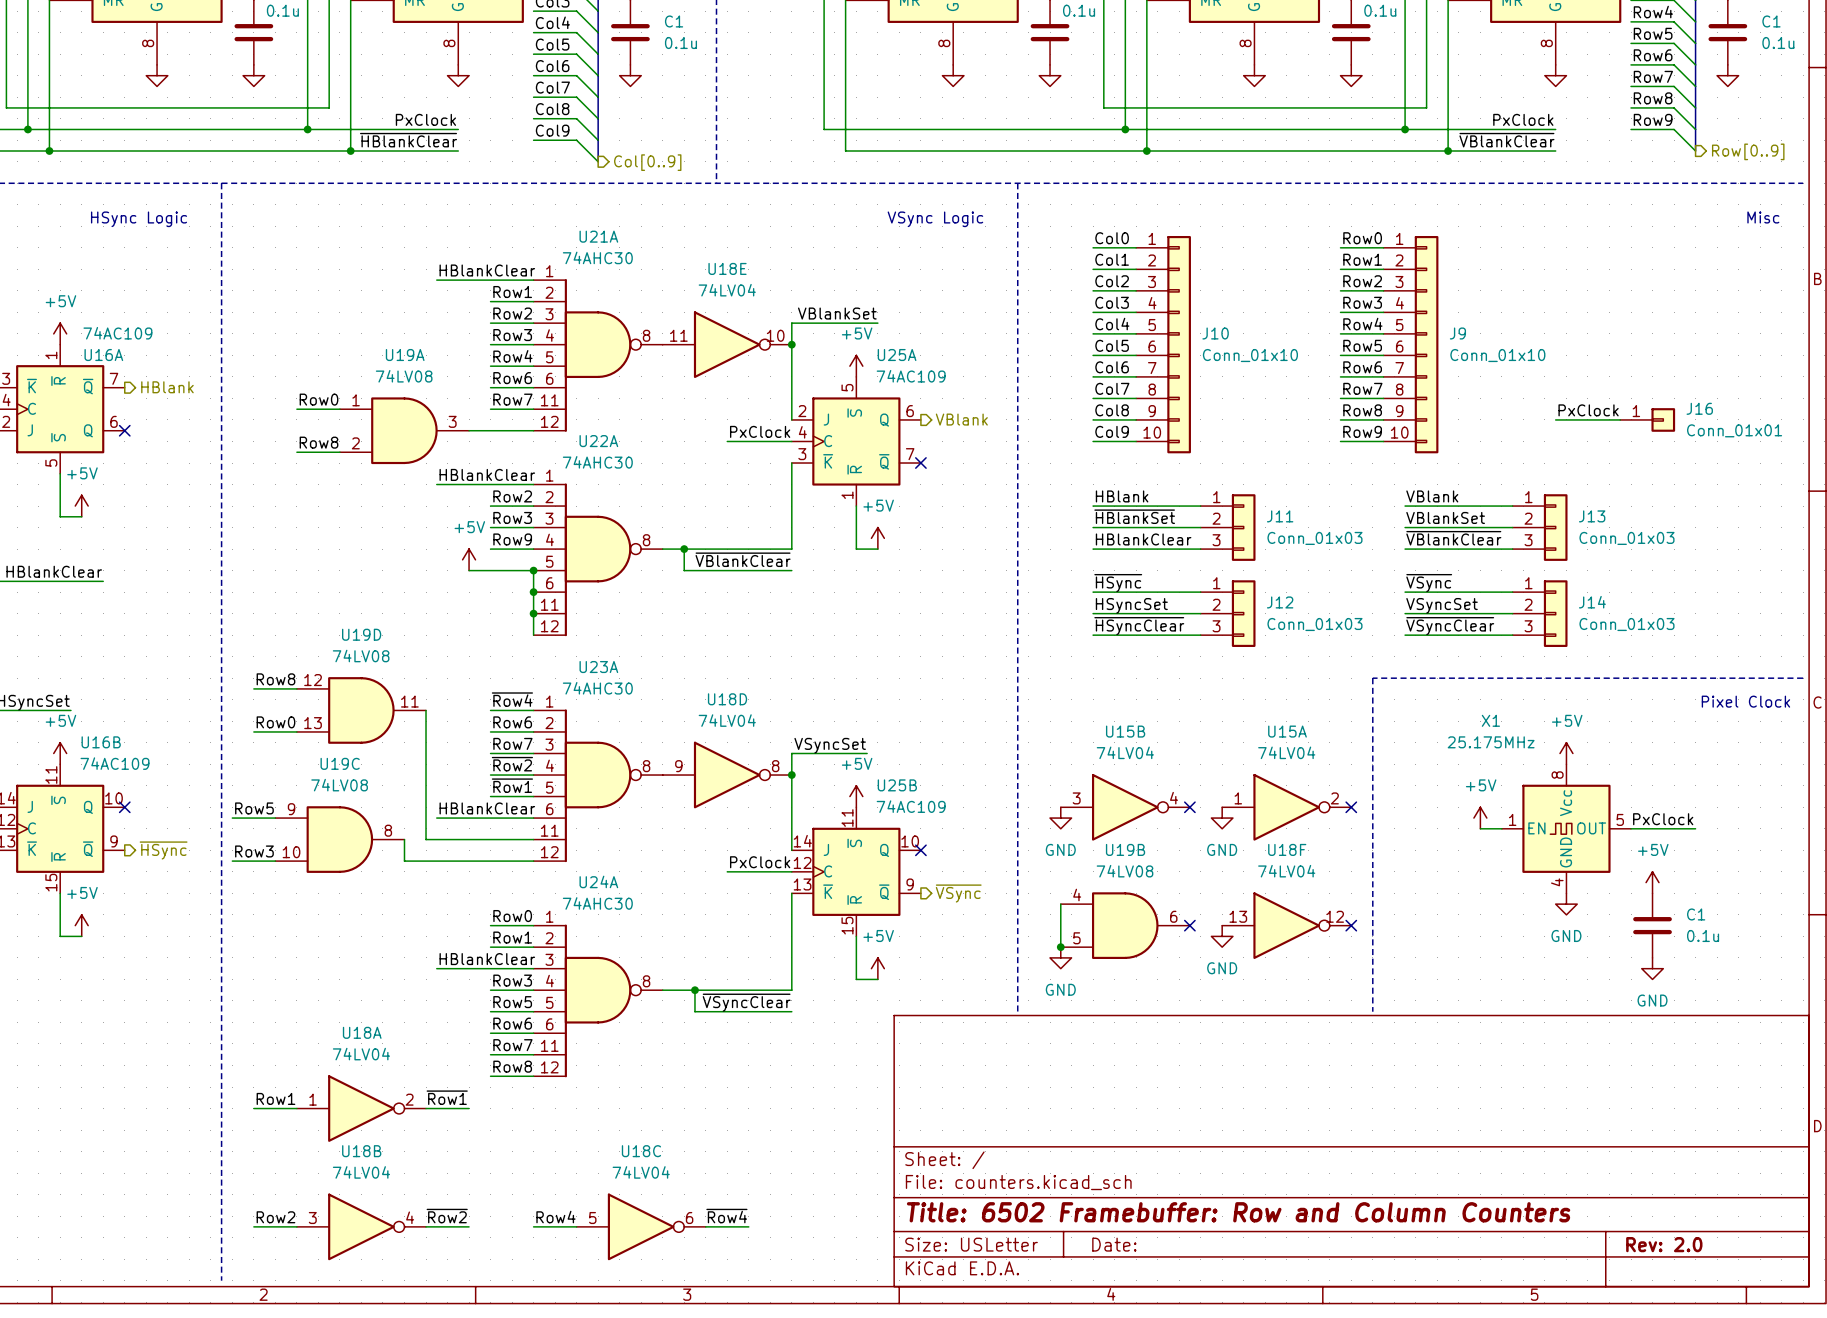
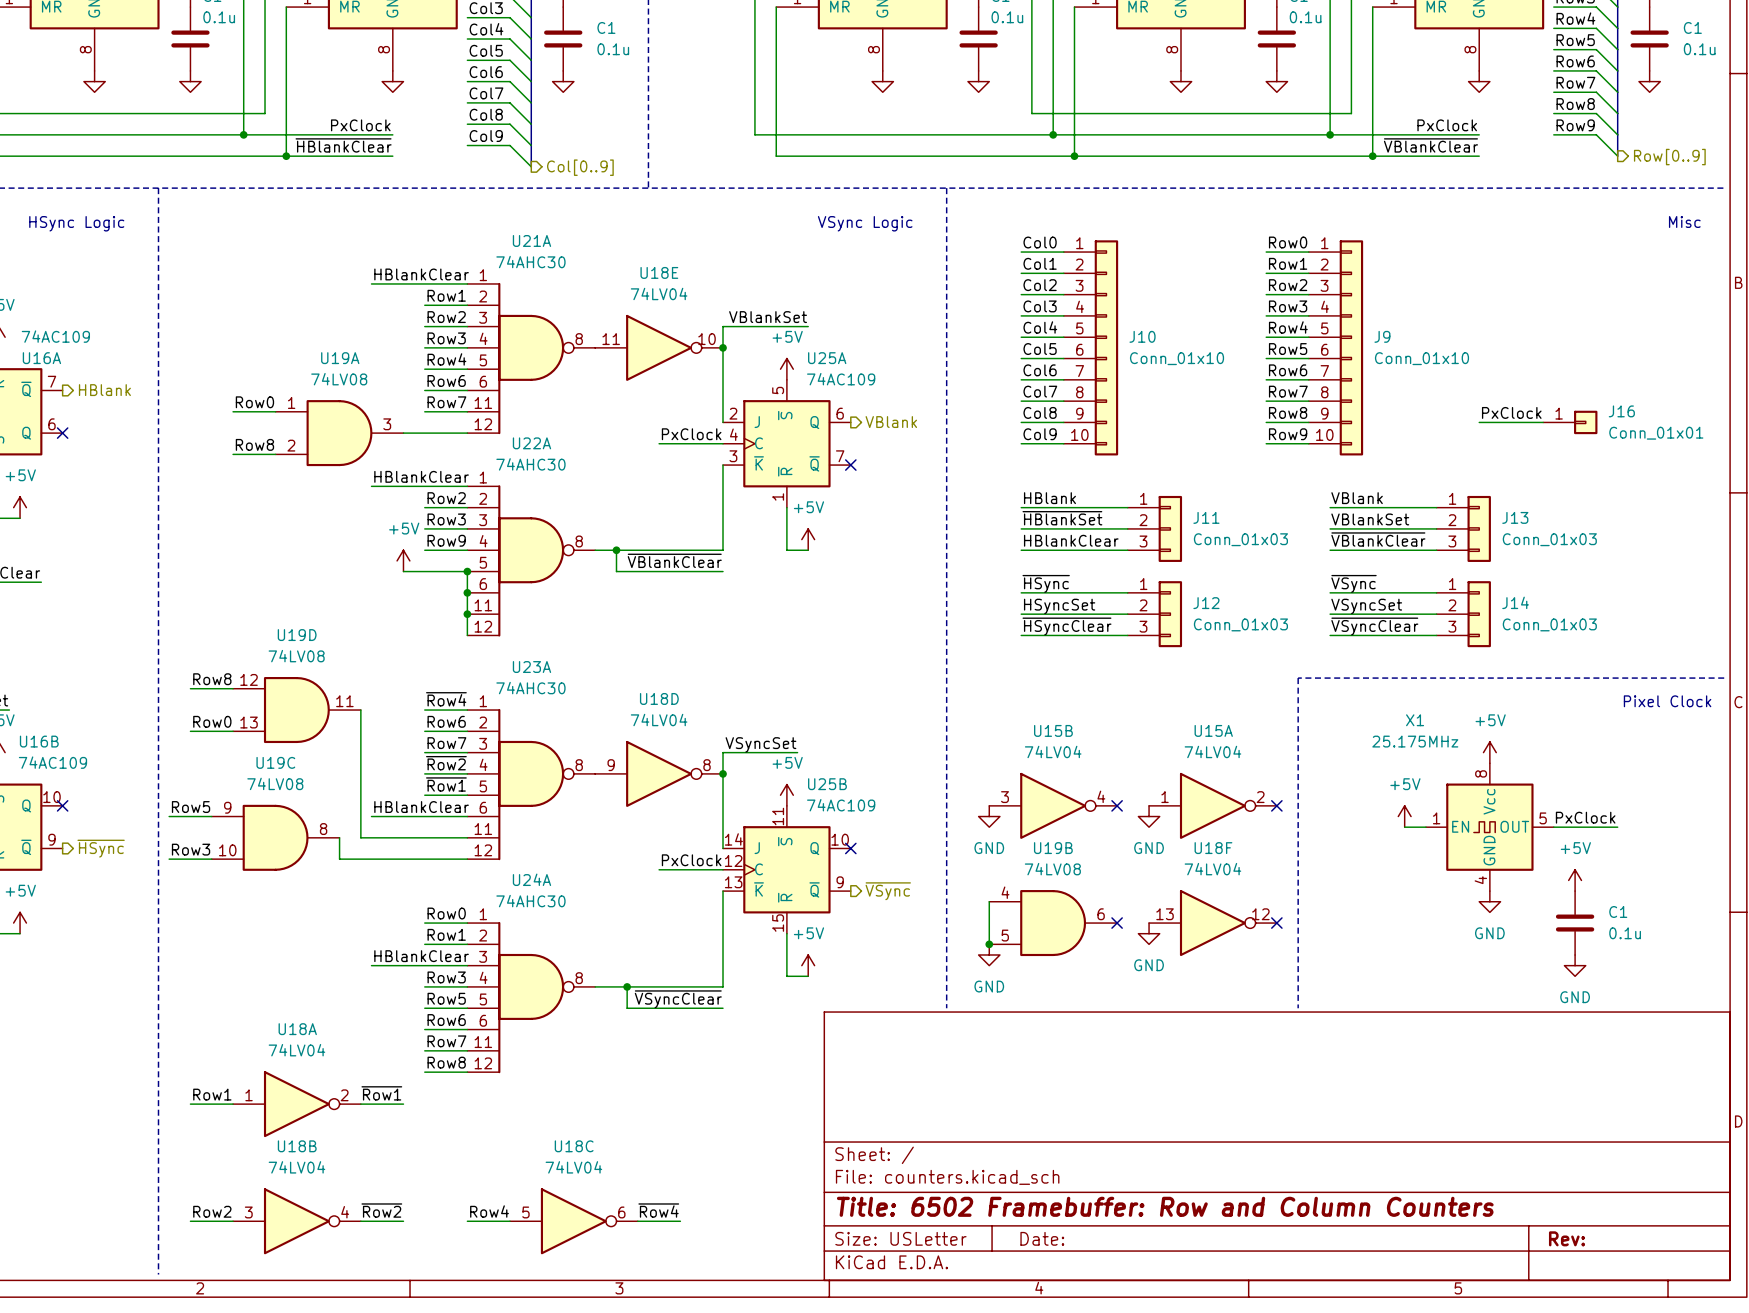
title block: Rev: 2.0 (1664, 1244) -> Rev: (1566, 1238)

